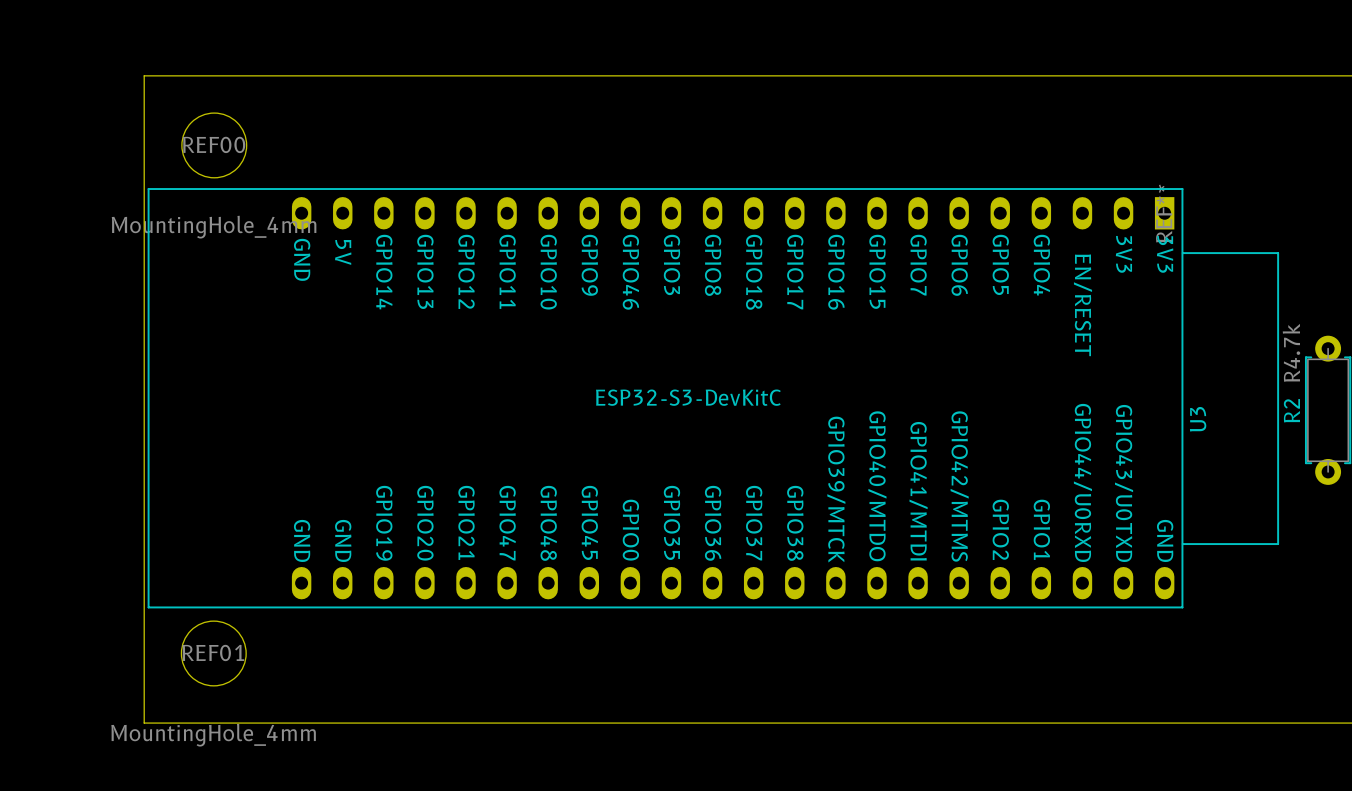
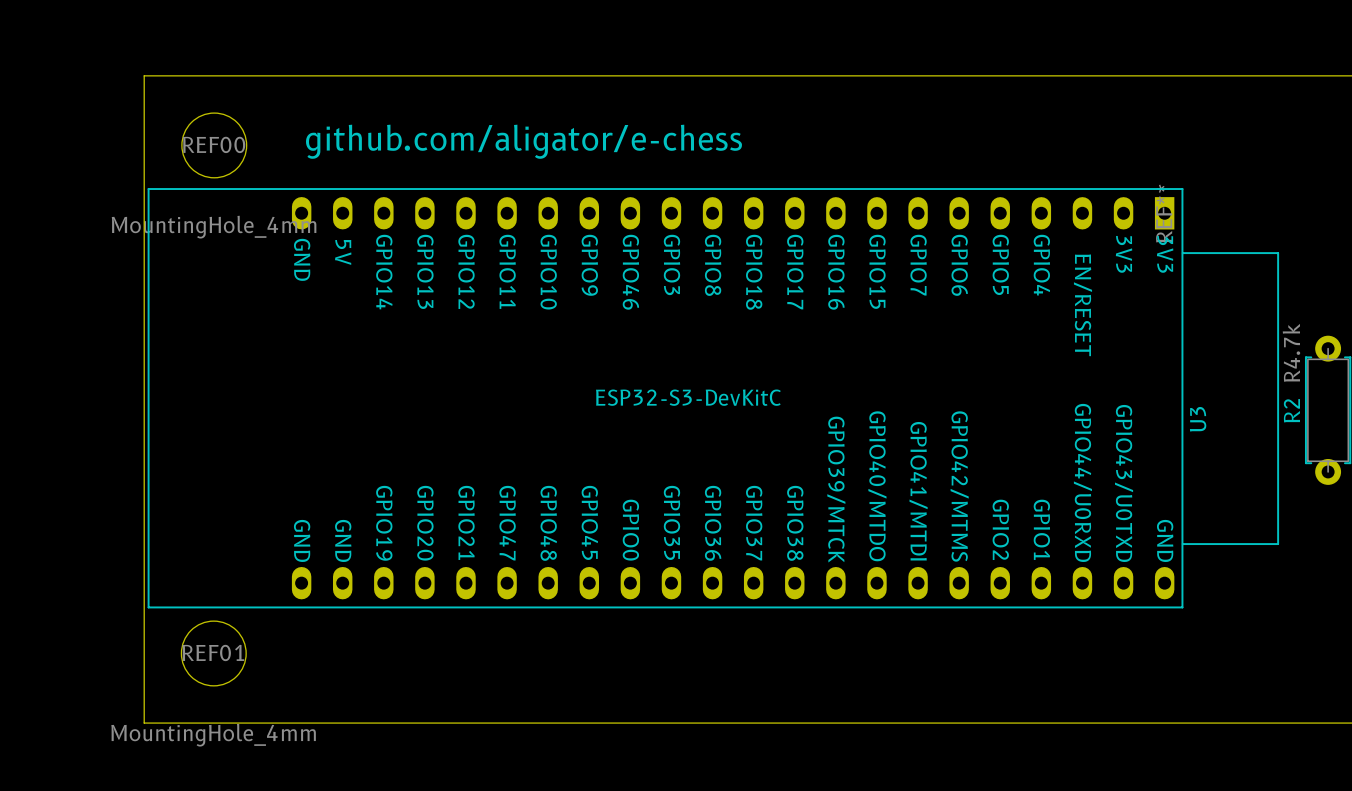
text: none -> github.com/aligator/e-chess (523, 141)

